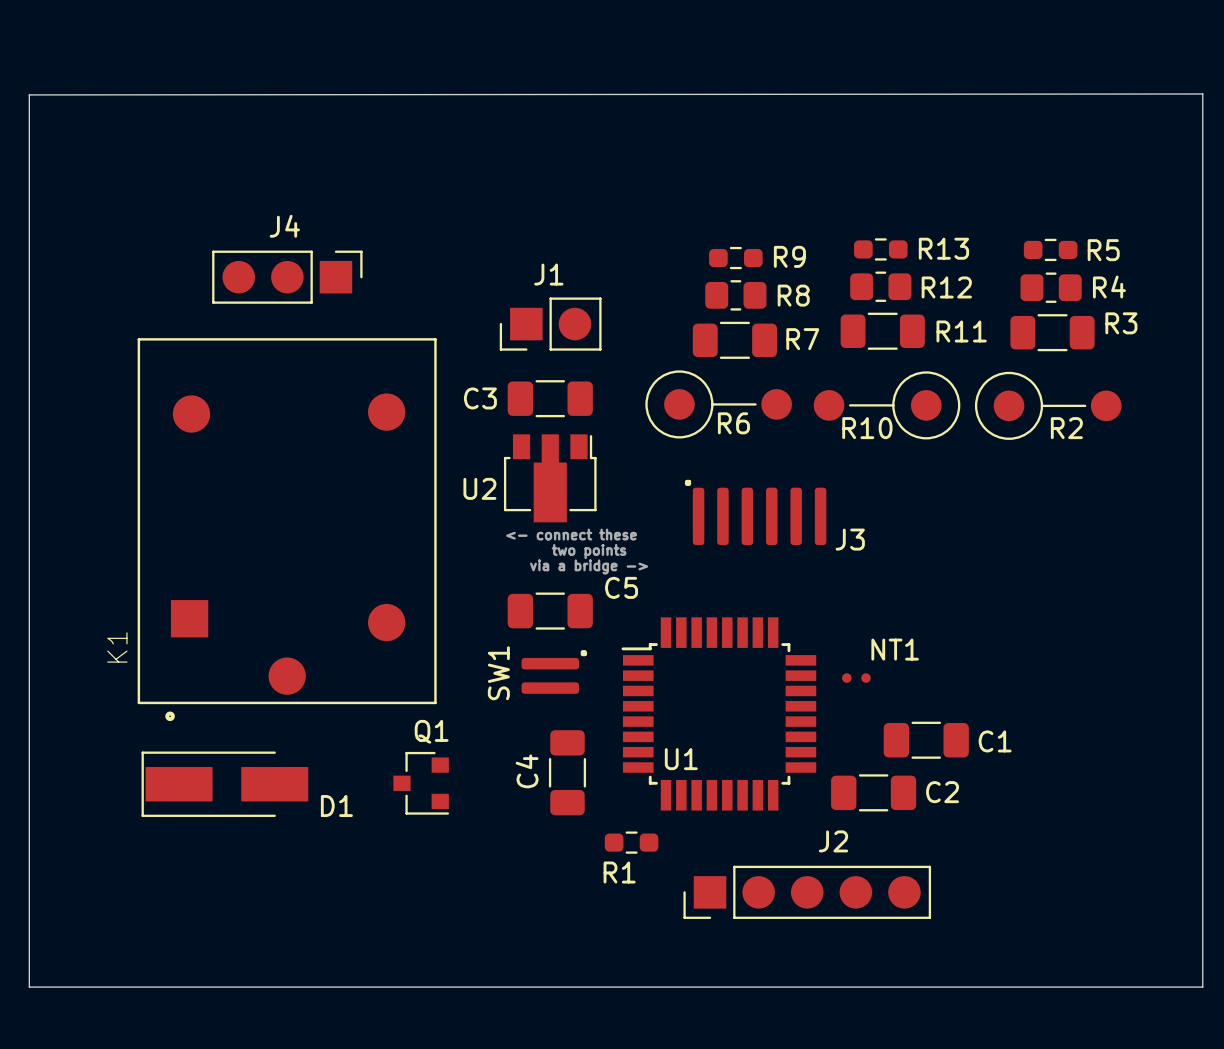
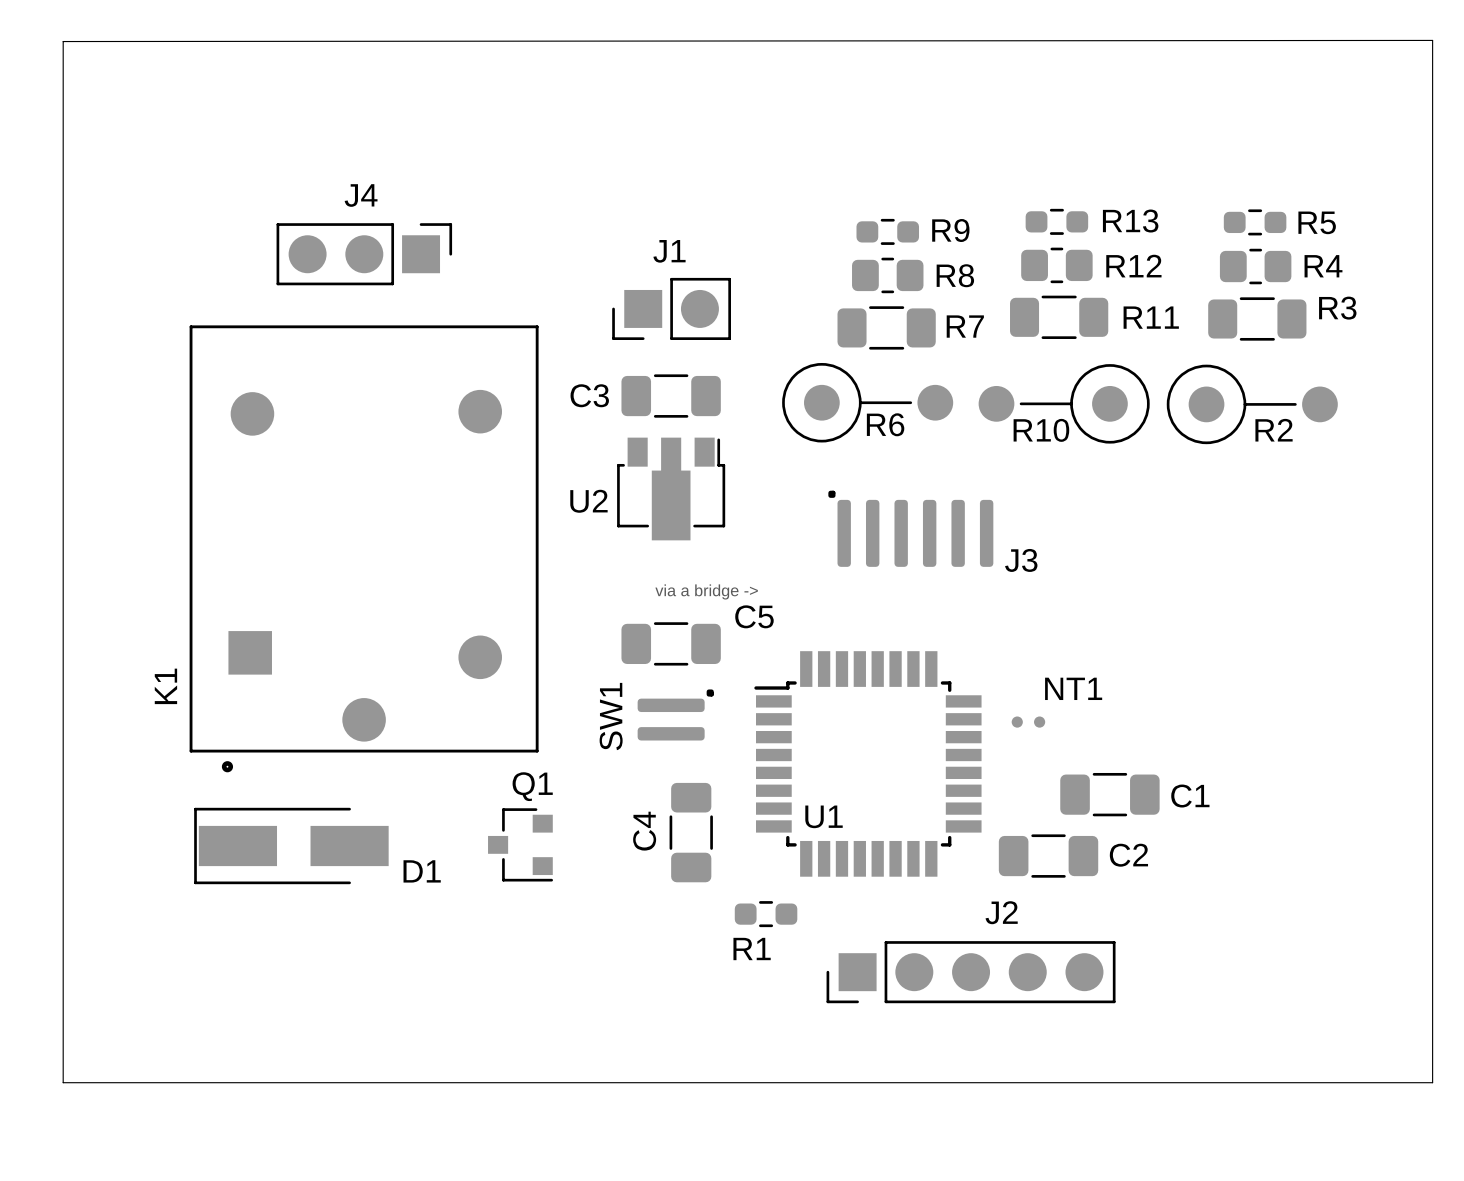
text: <- connect these (571, 534) -> none
text: two points (589, 551) -> none

